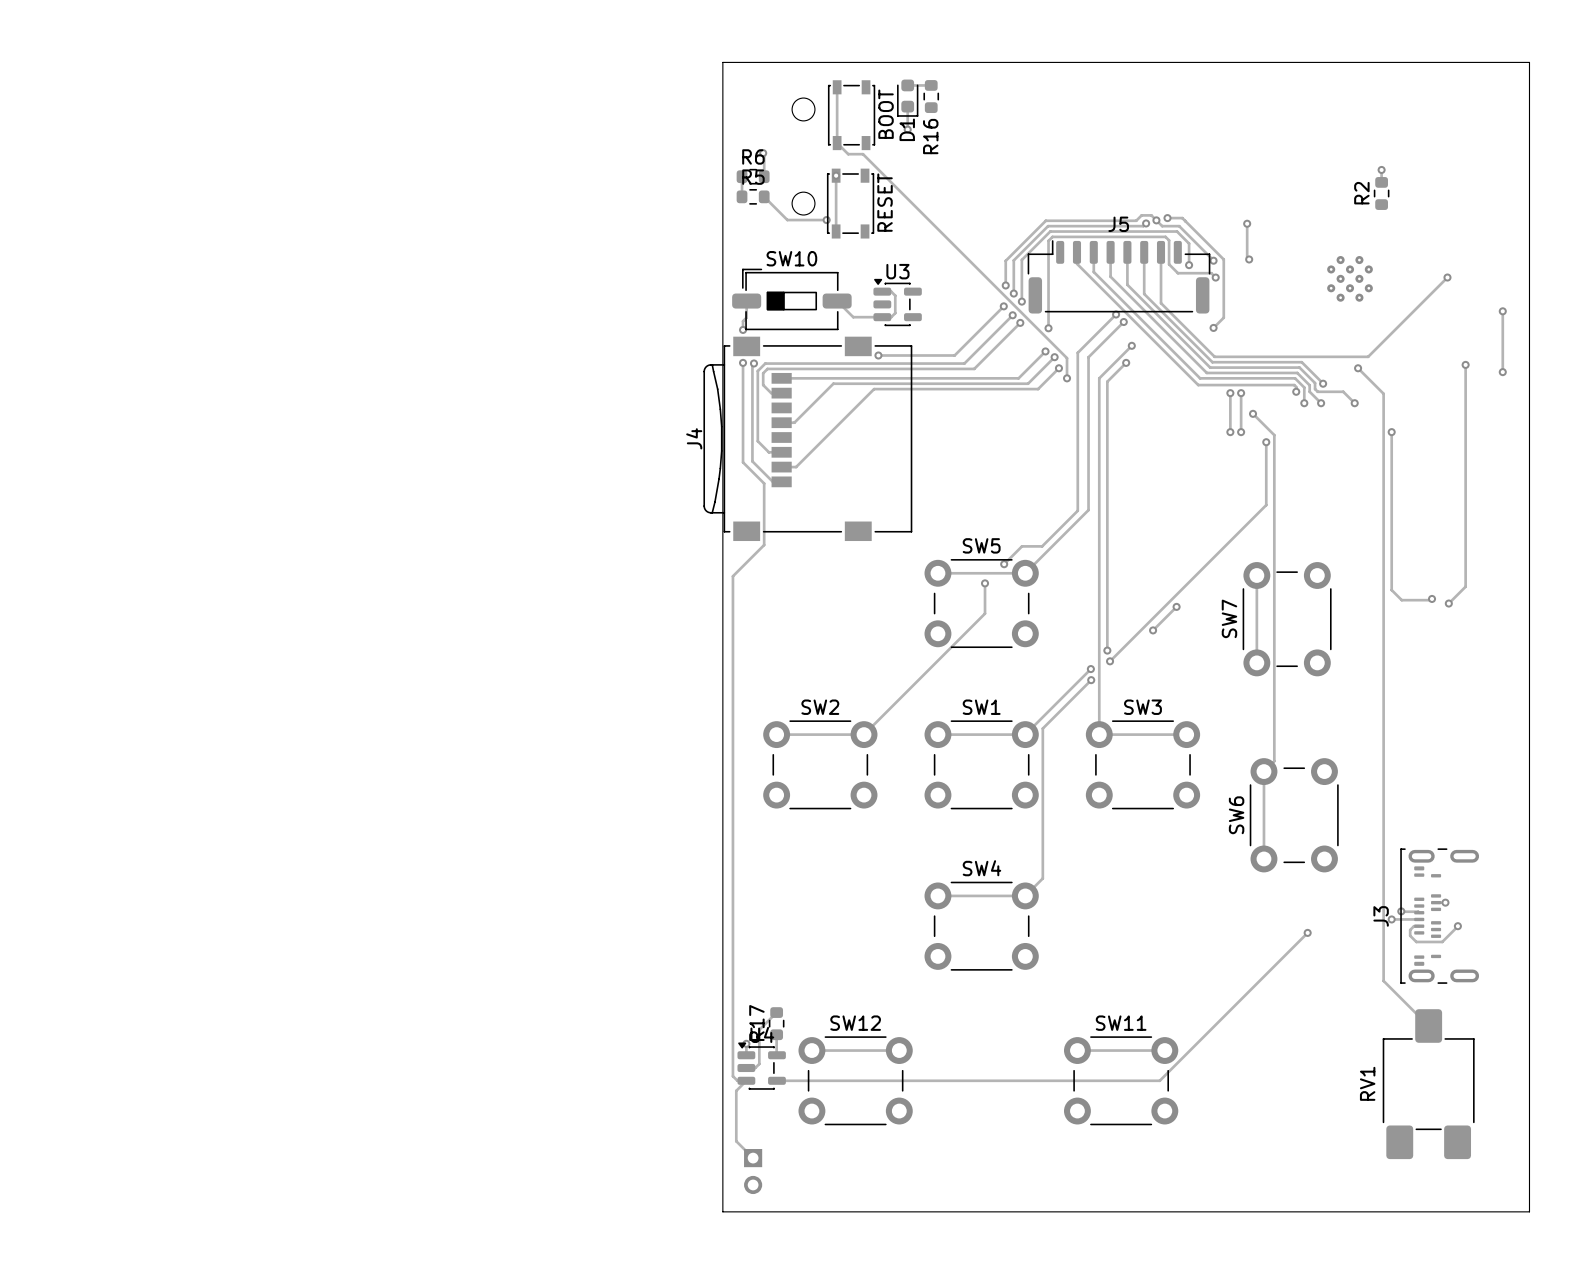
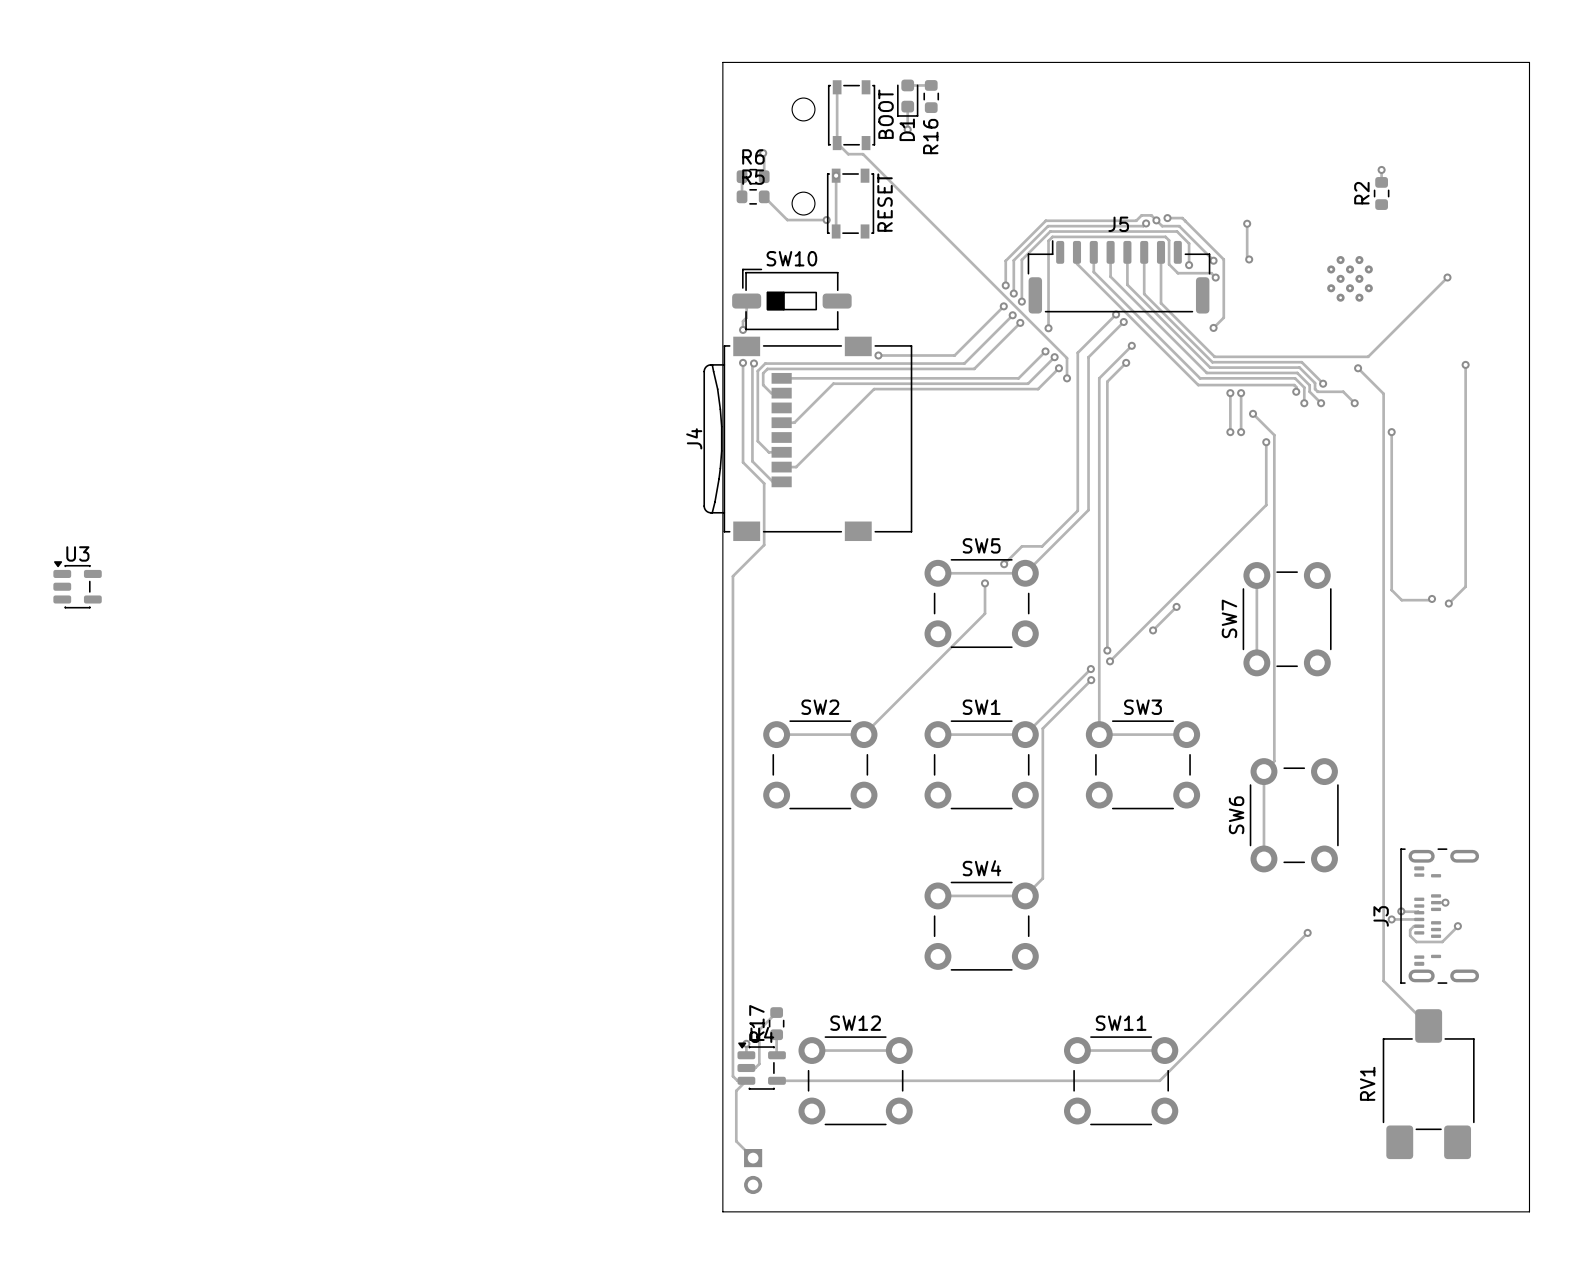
track: (882, 291) (891, 291) (895, 295) (895, 313) (891, 317) (853, 317) (837, 301) -> none
U3 position: (897, 302) -> (77, 584)
track: (1502, 311) (1502, 372) -> none
via: (1502, 311) -> none
via: (1502, 372) -> none

